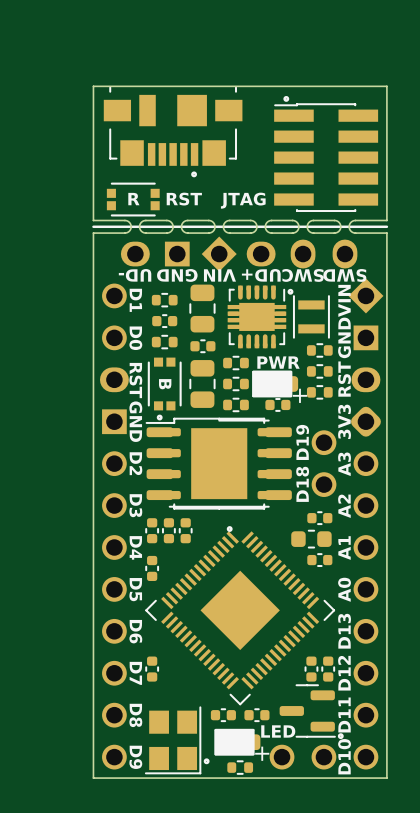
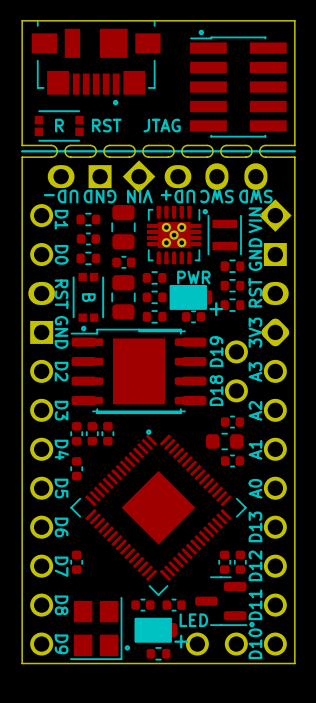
part footprint: [227, 285, 287, 349] -> [146, 205, 202, 265]

